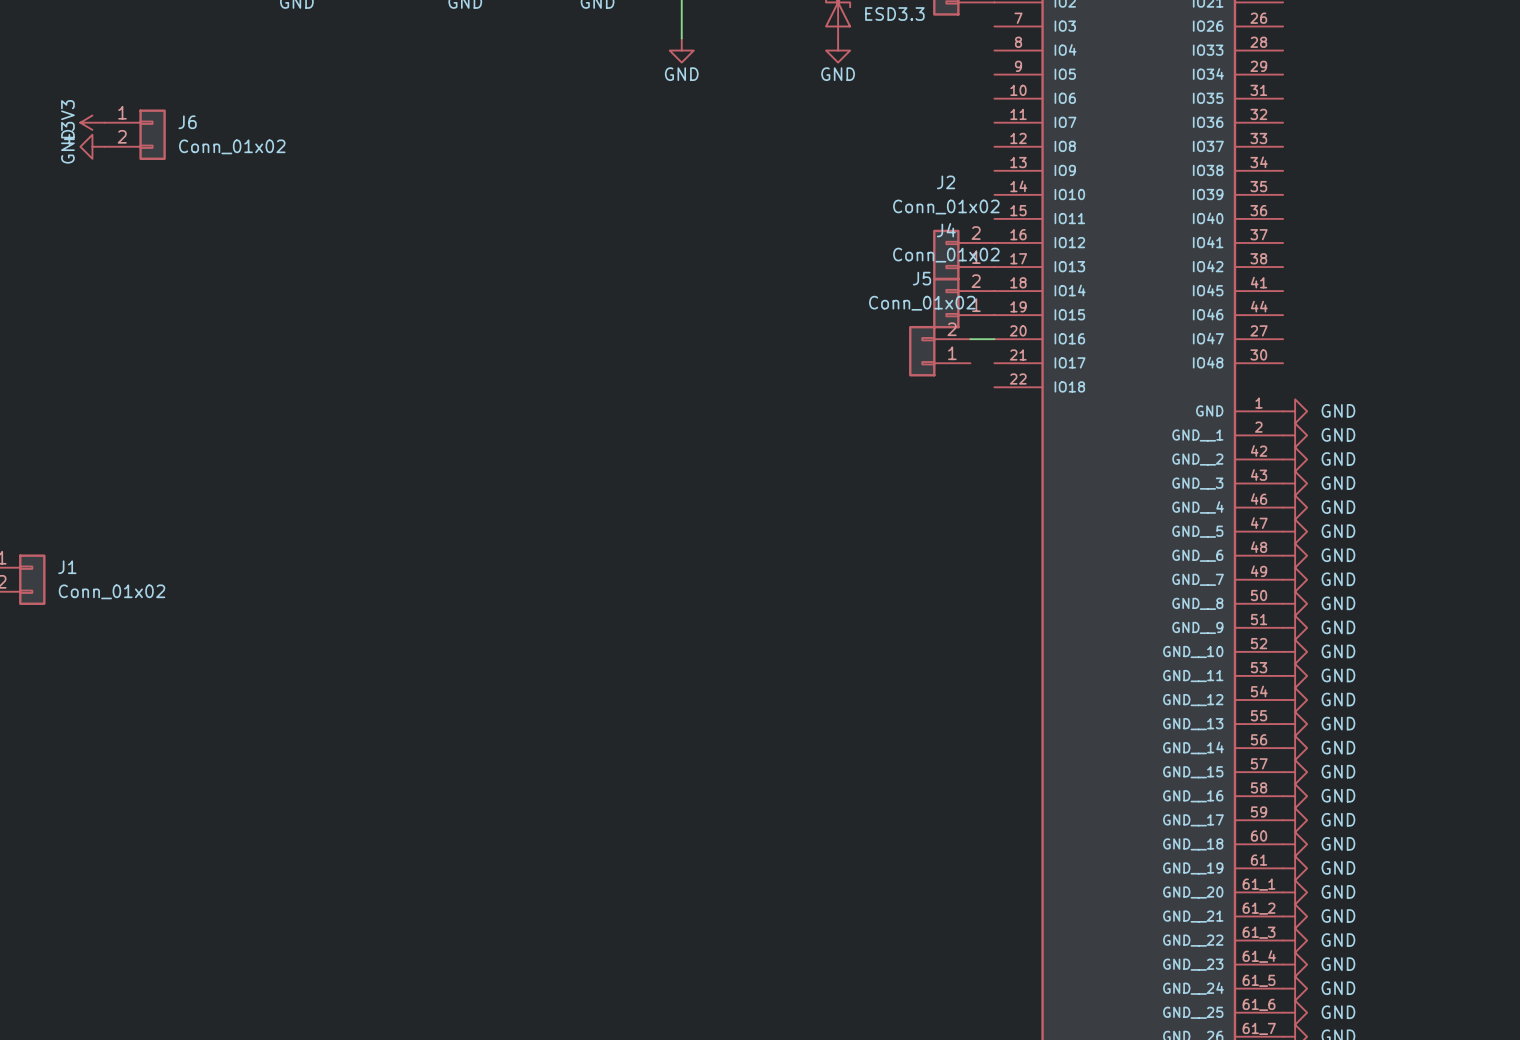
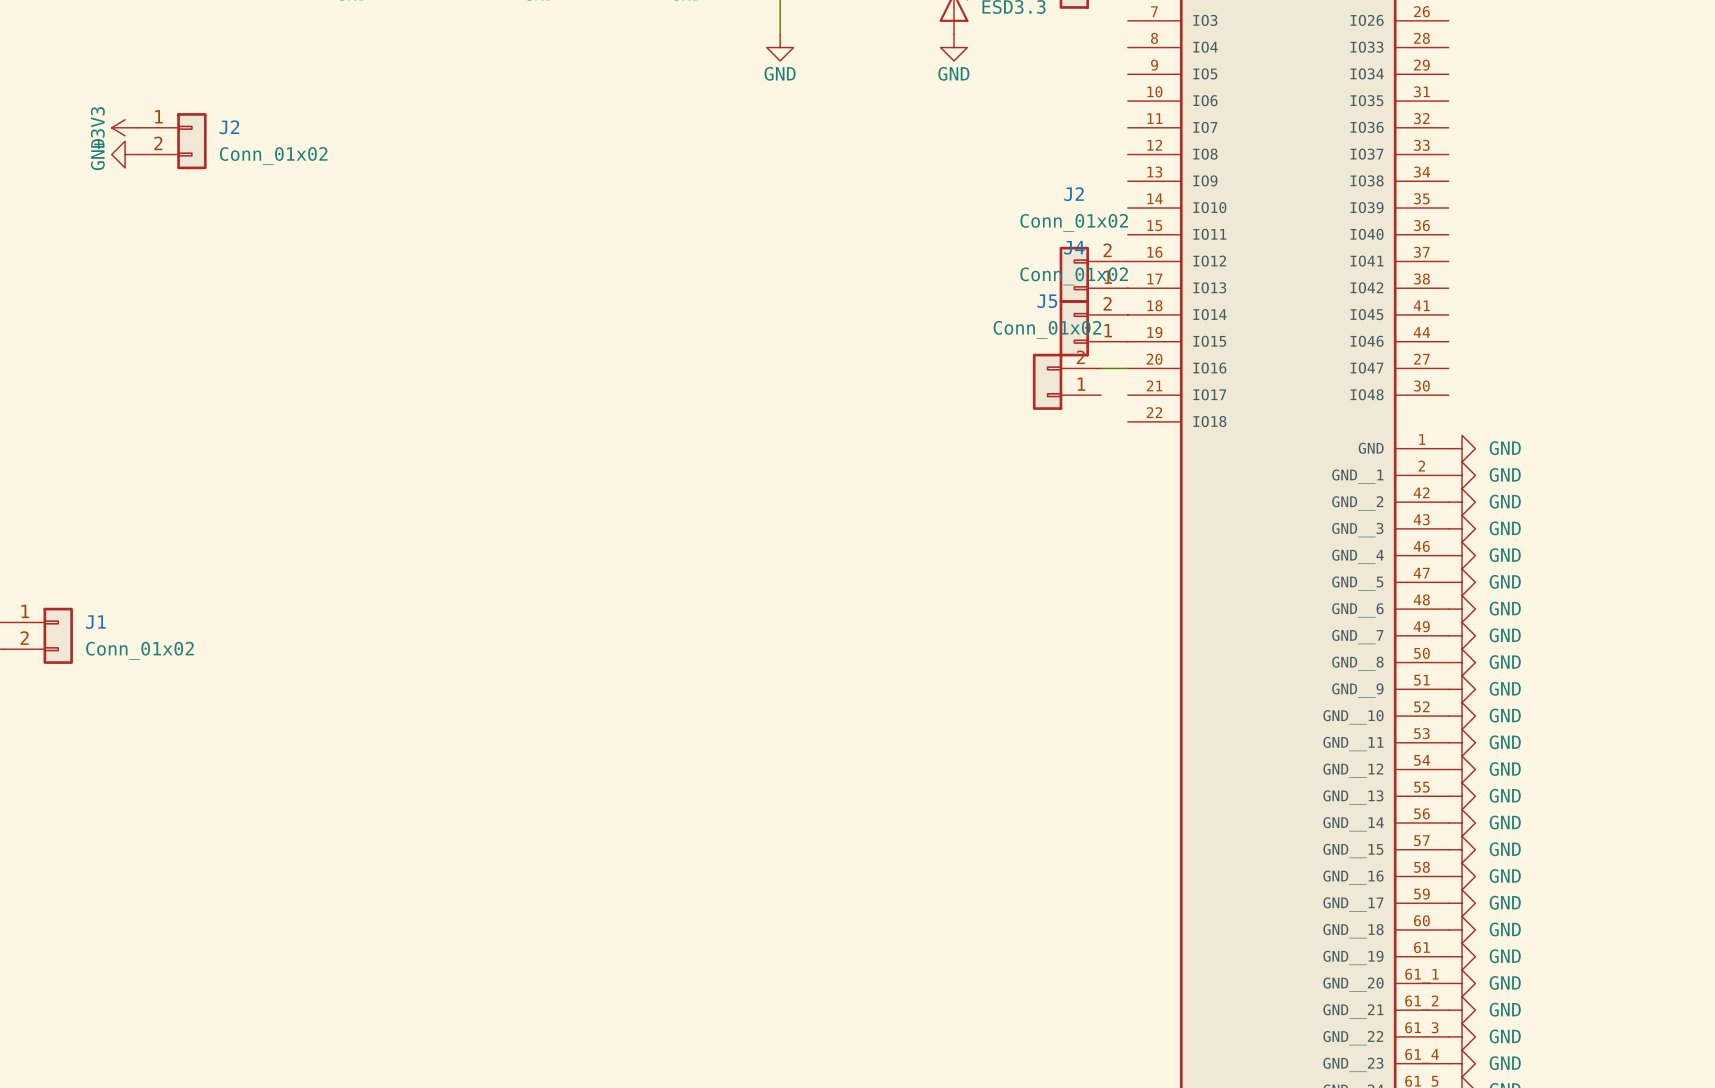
J6 name: J6 (187, 122) -> J2 (229, 127)

